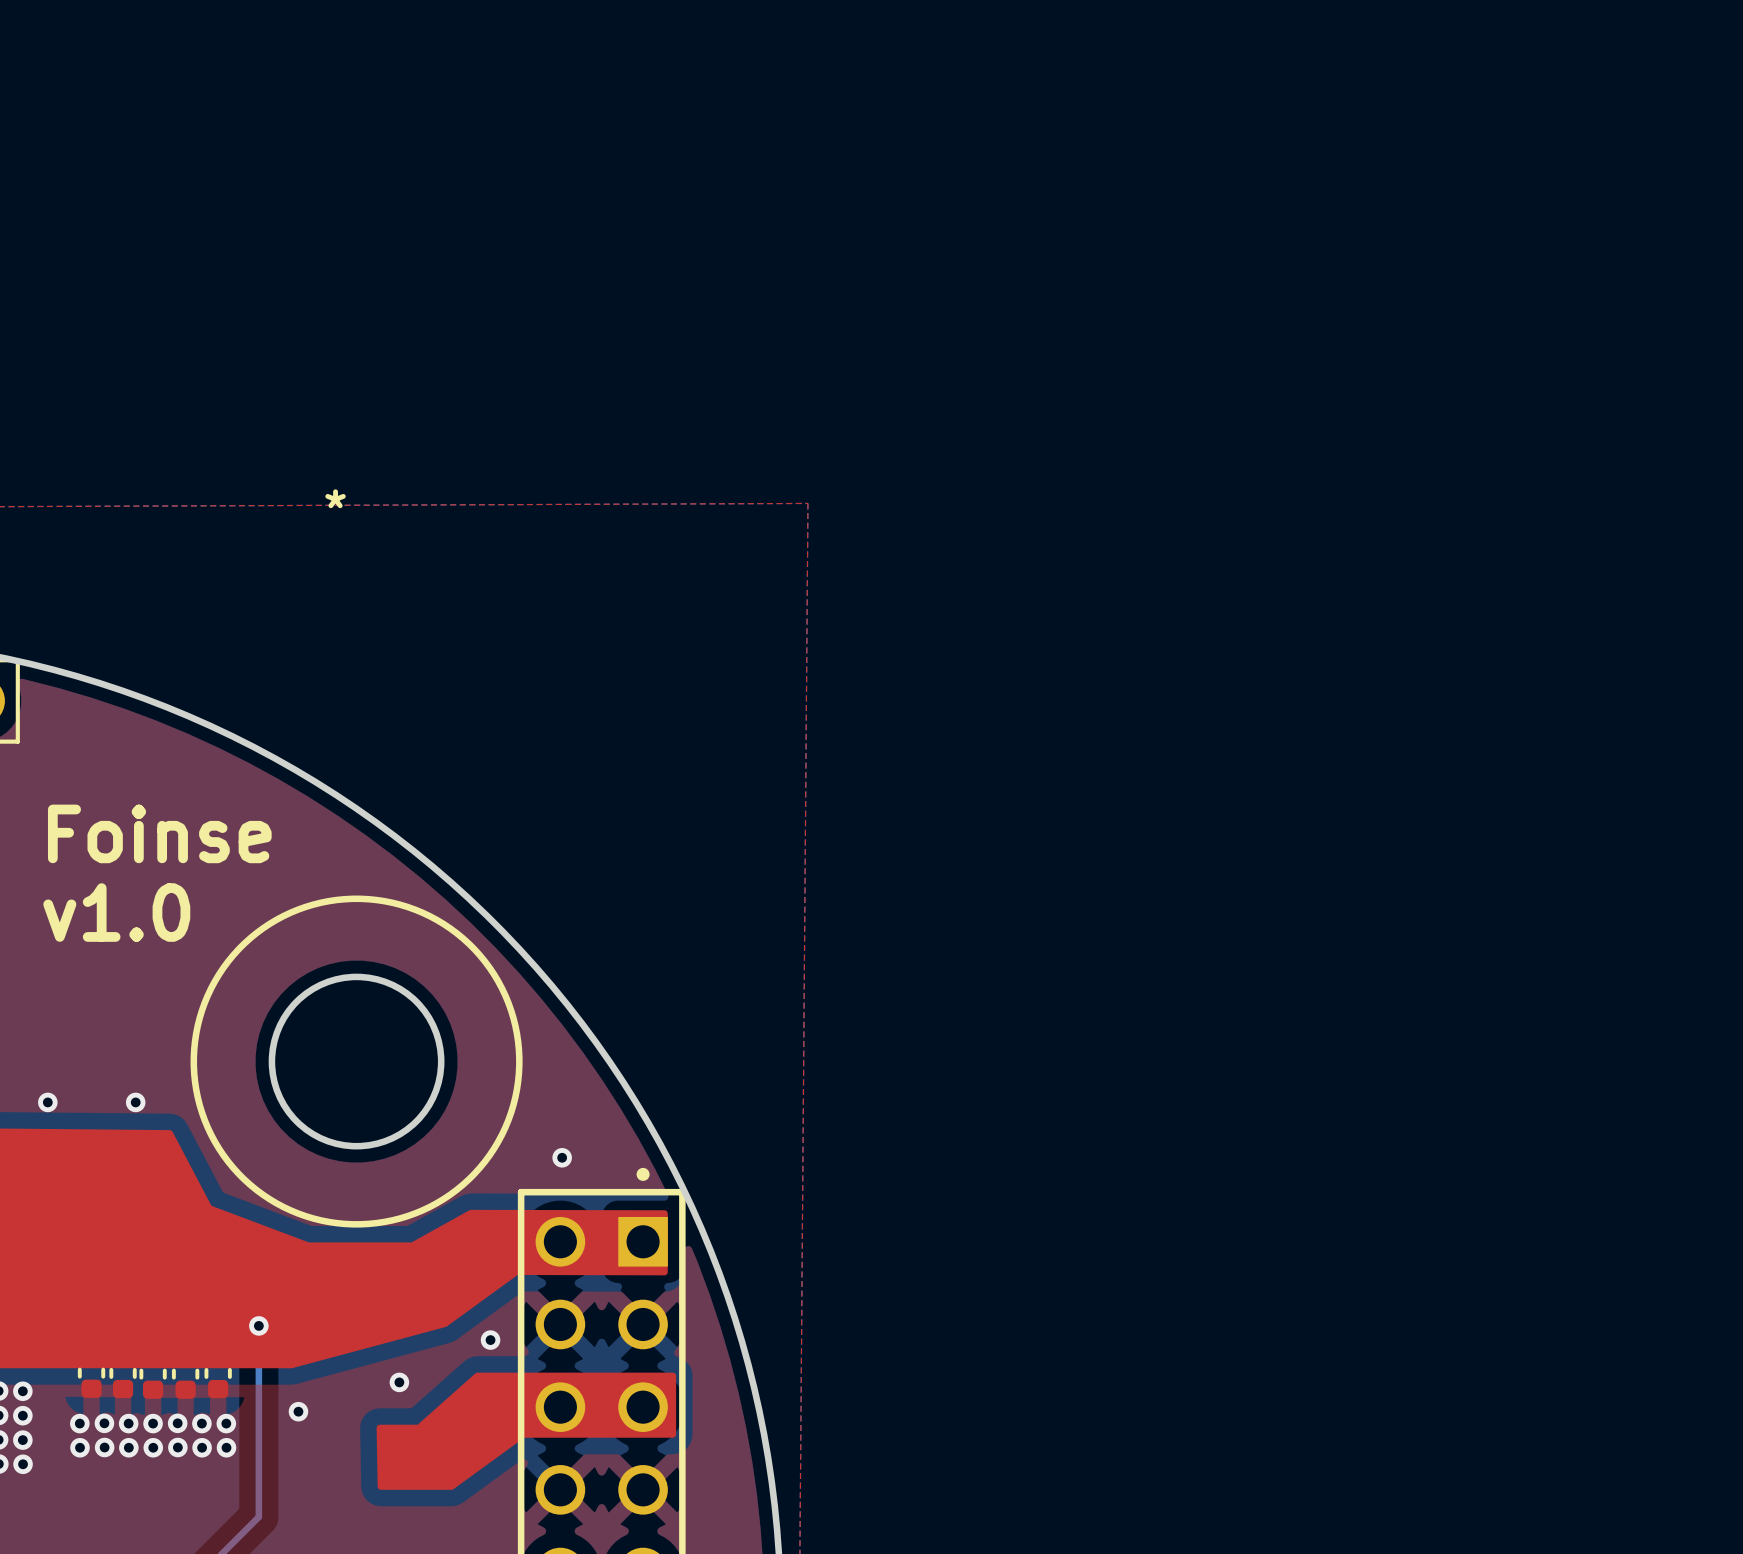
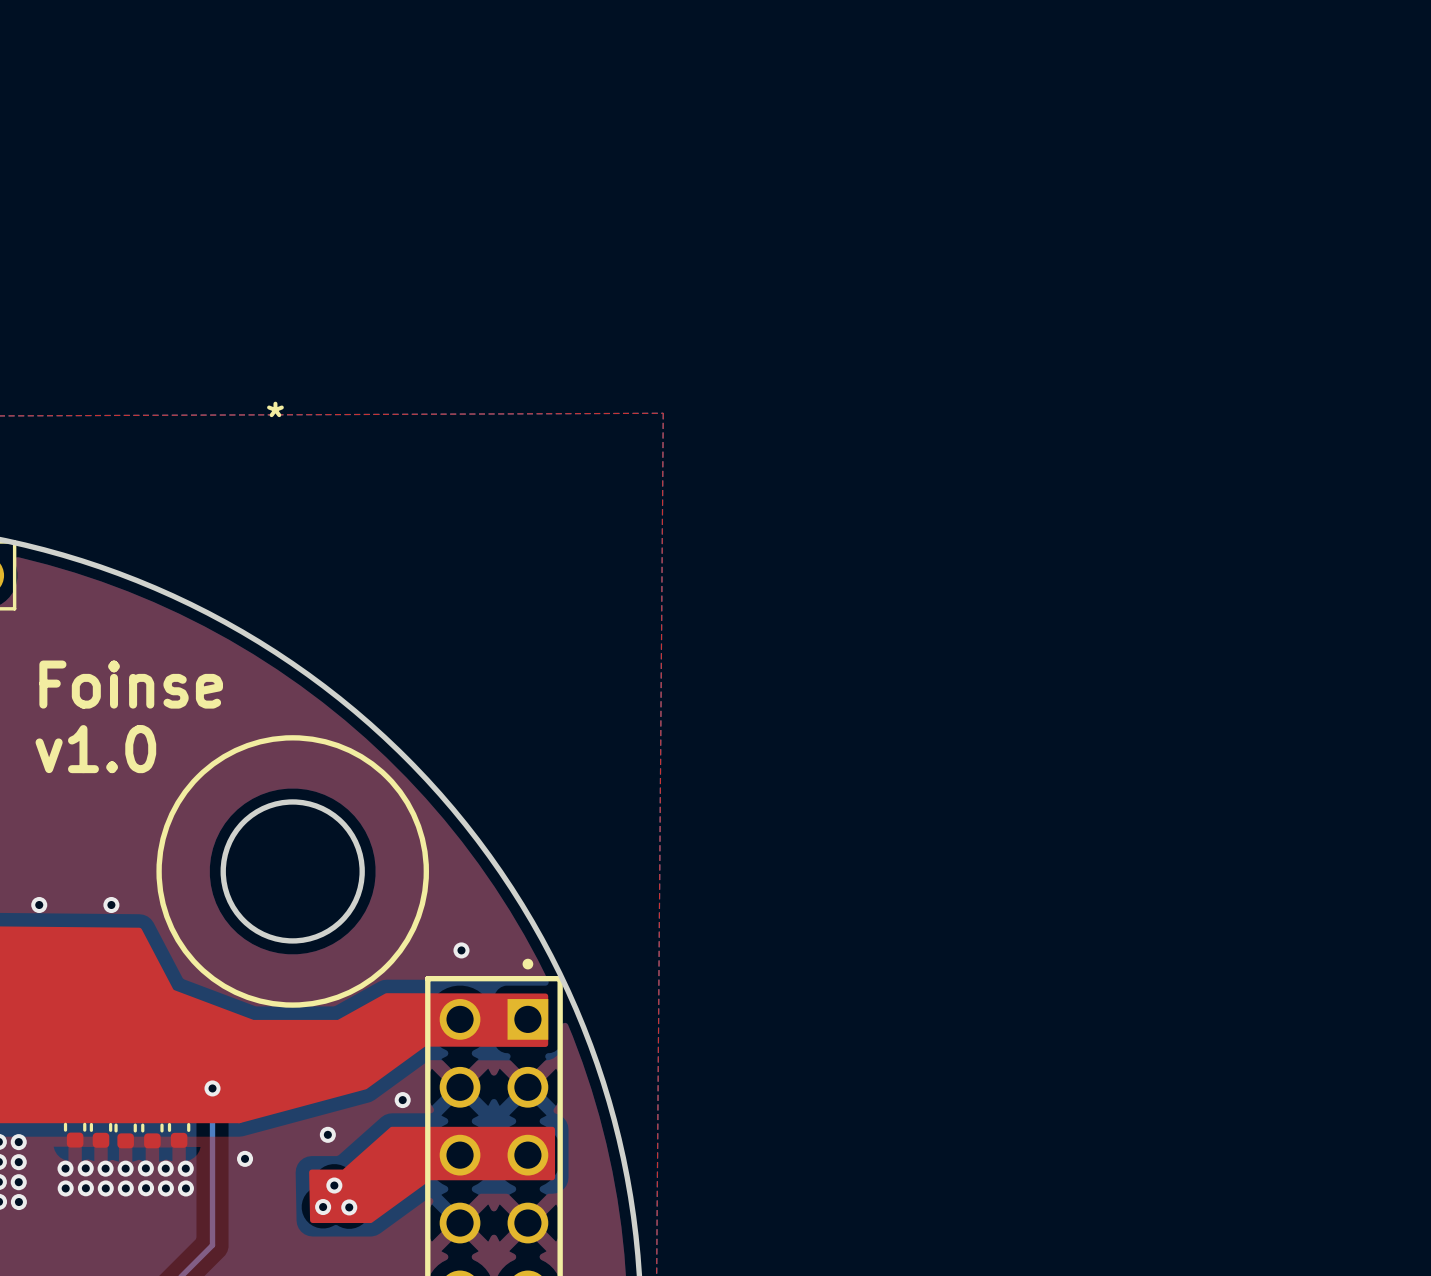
via: none -> (334, 1185)
via: none -> (323, 1207)
via: none -> (349, 1207)

